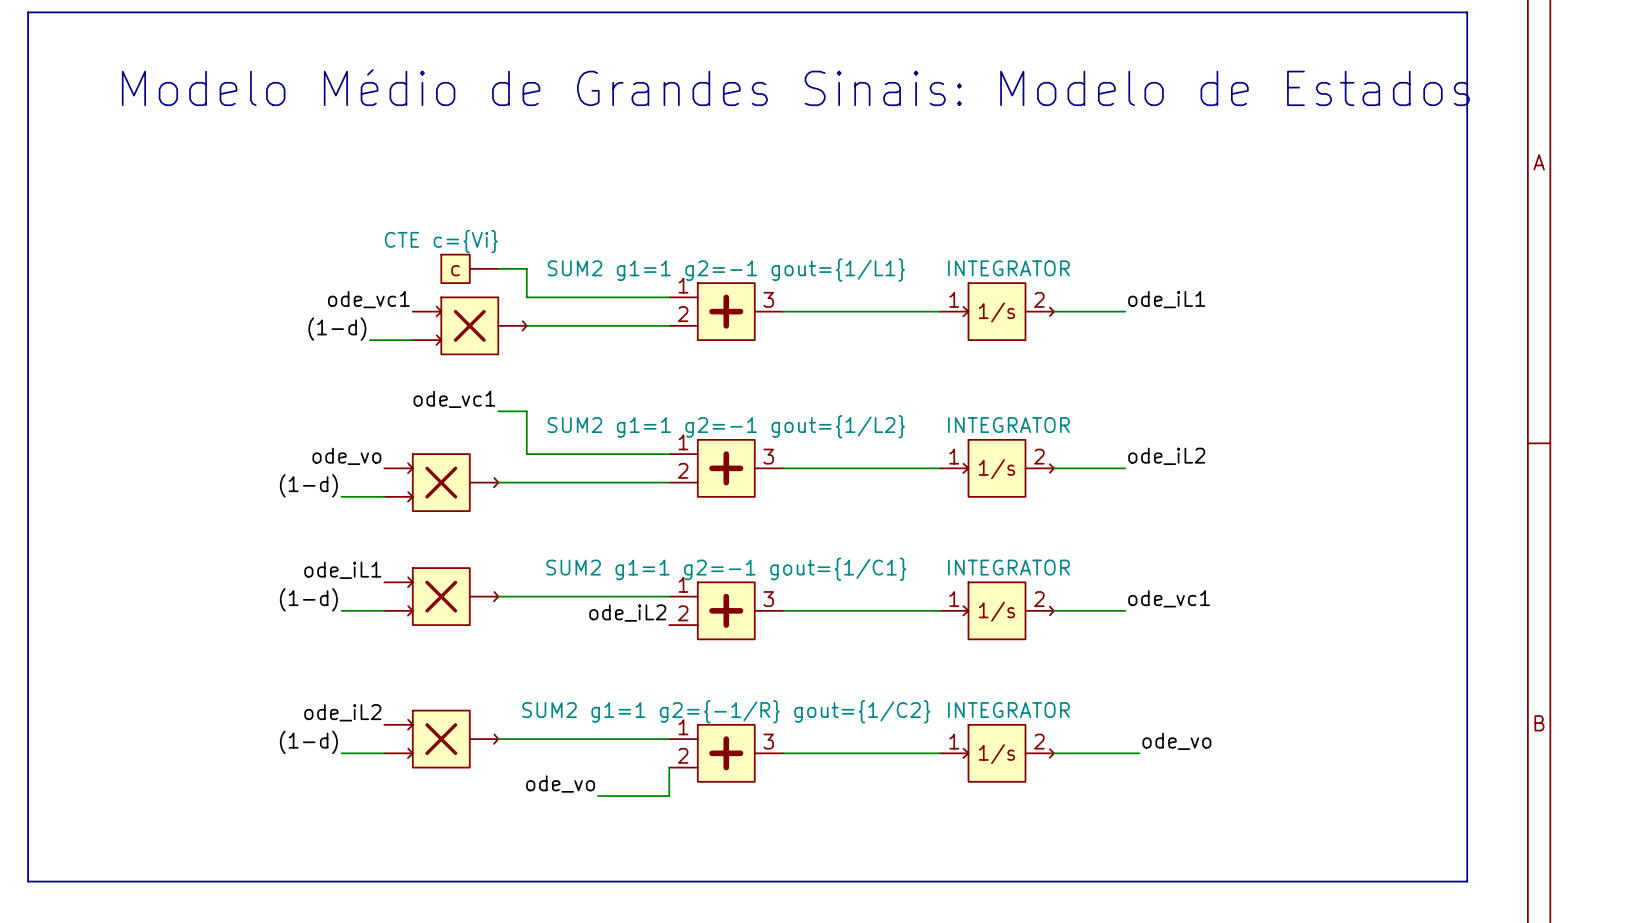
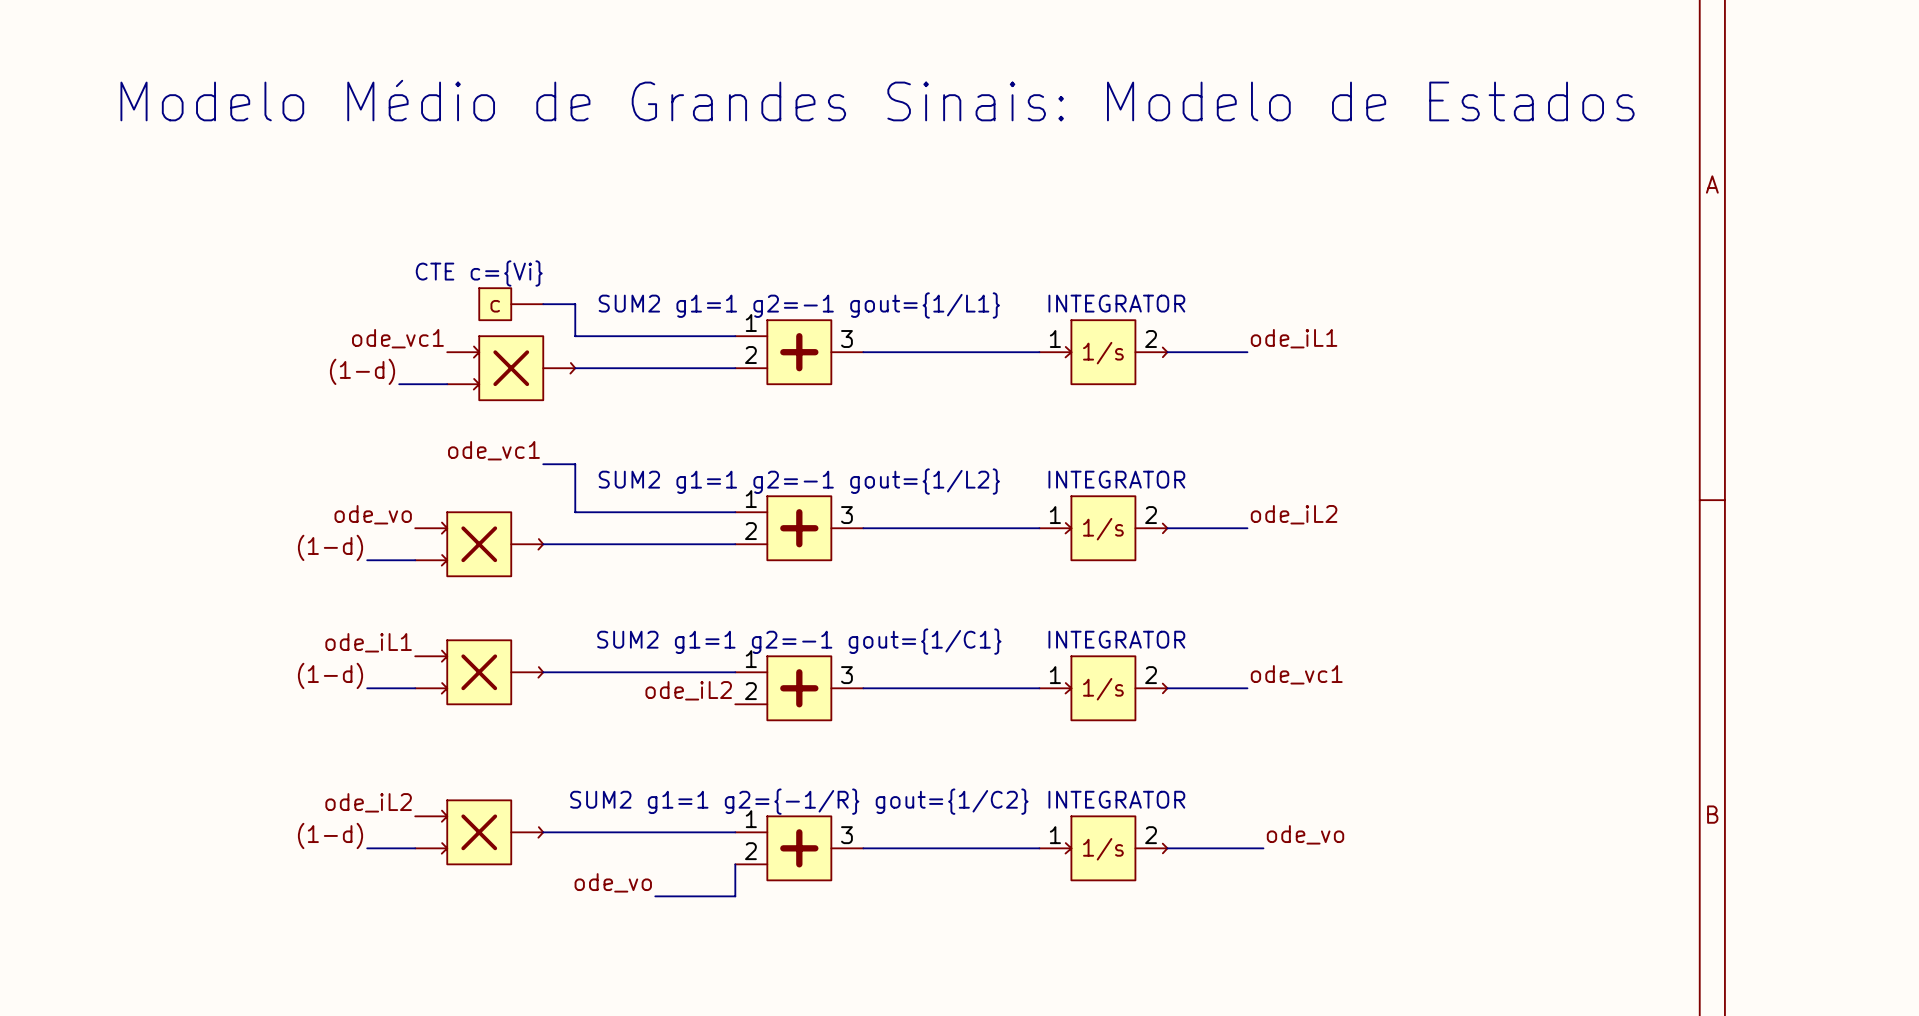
line: (28, 12) (1467, 12) (1467, 881) (28, 881) (28, 12) -> none

